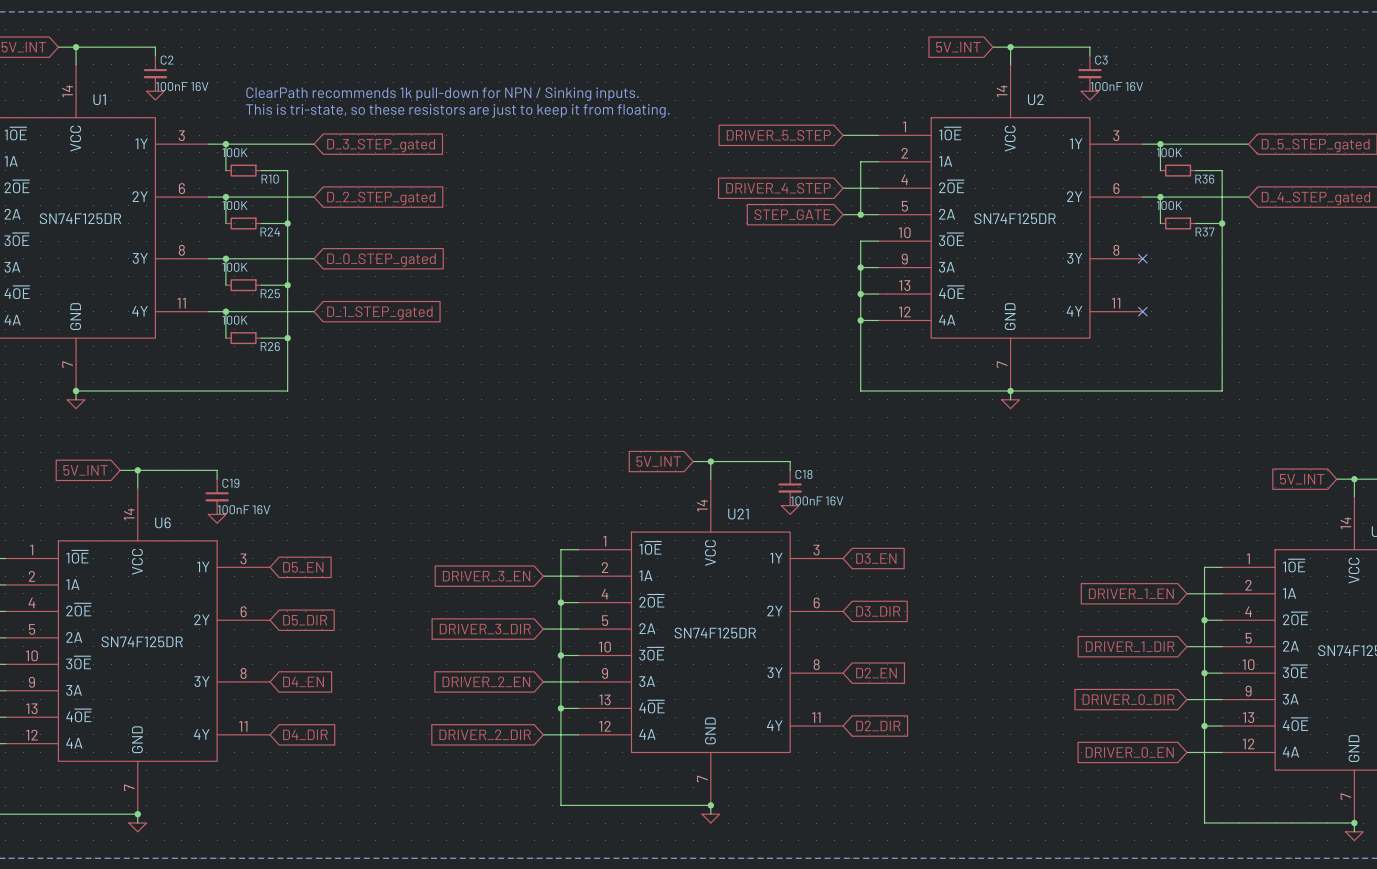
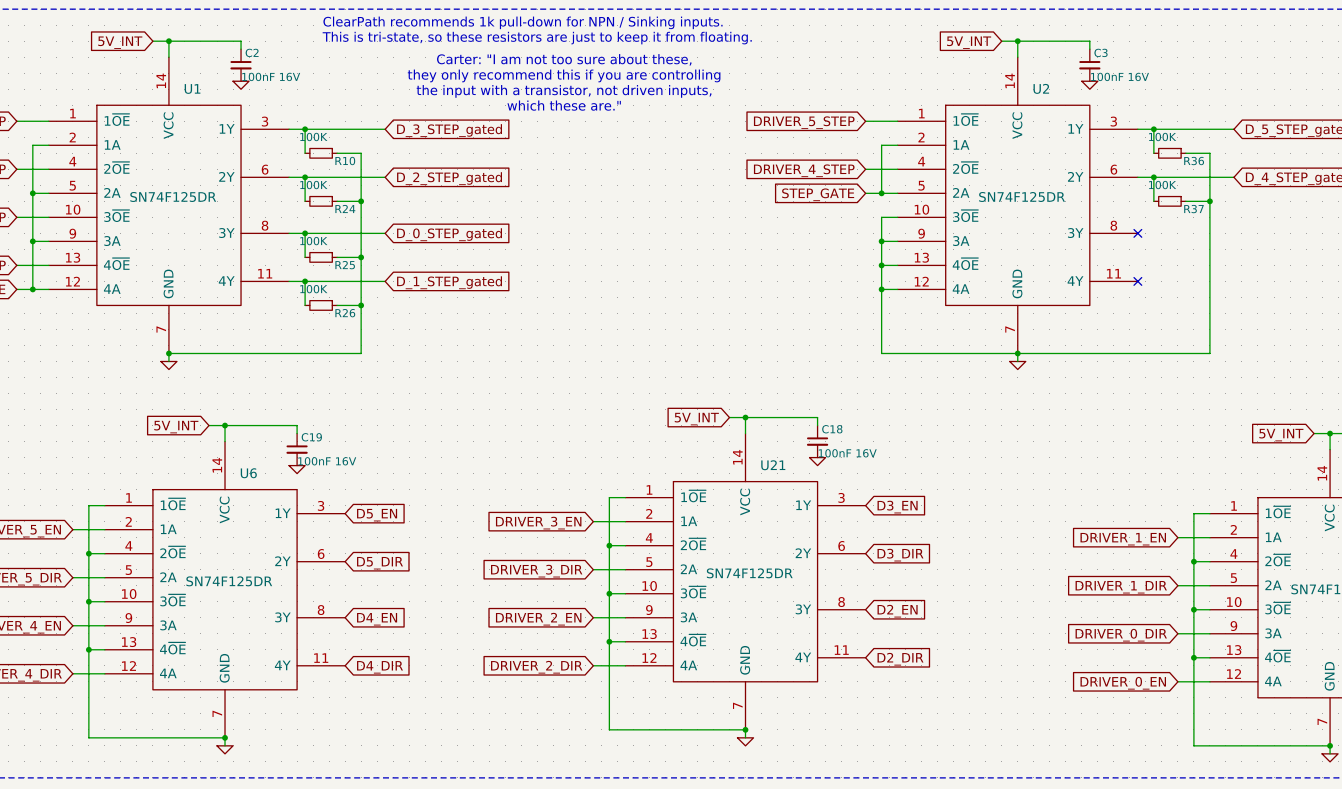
text: none -> Carter: "I am not too sure about these, (564, 59)
text: none -> they only recommend this if you are controlling (564, 75)
text position: ClearPath recommends 1k pull-down for NPN / Sinking inputs. (442, 94) -> ClearPath recommends 1k pull-down for NPN / Sinking inputs. (523, 22)
text: none -> the input with a transistor, not driven inputs, (564, 91)
text position: This is tri-state, so these resistors are just to keep it from floating. (457, 110) -> This is tri-state, so these resistors are just to keep it from floating. (537, 38)
text: none -> which these are." (564, 105)

